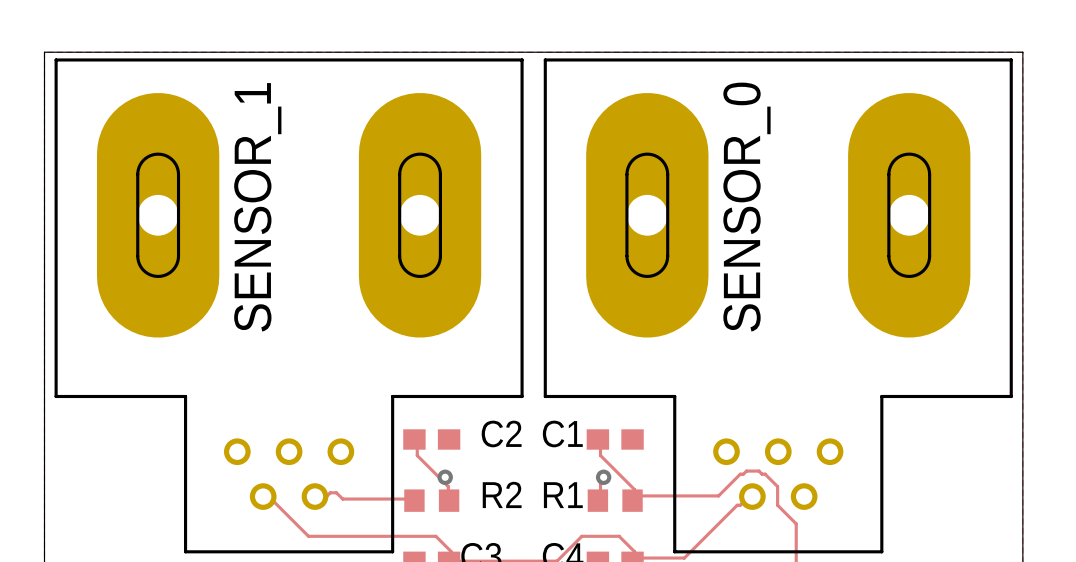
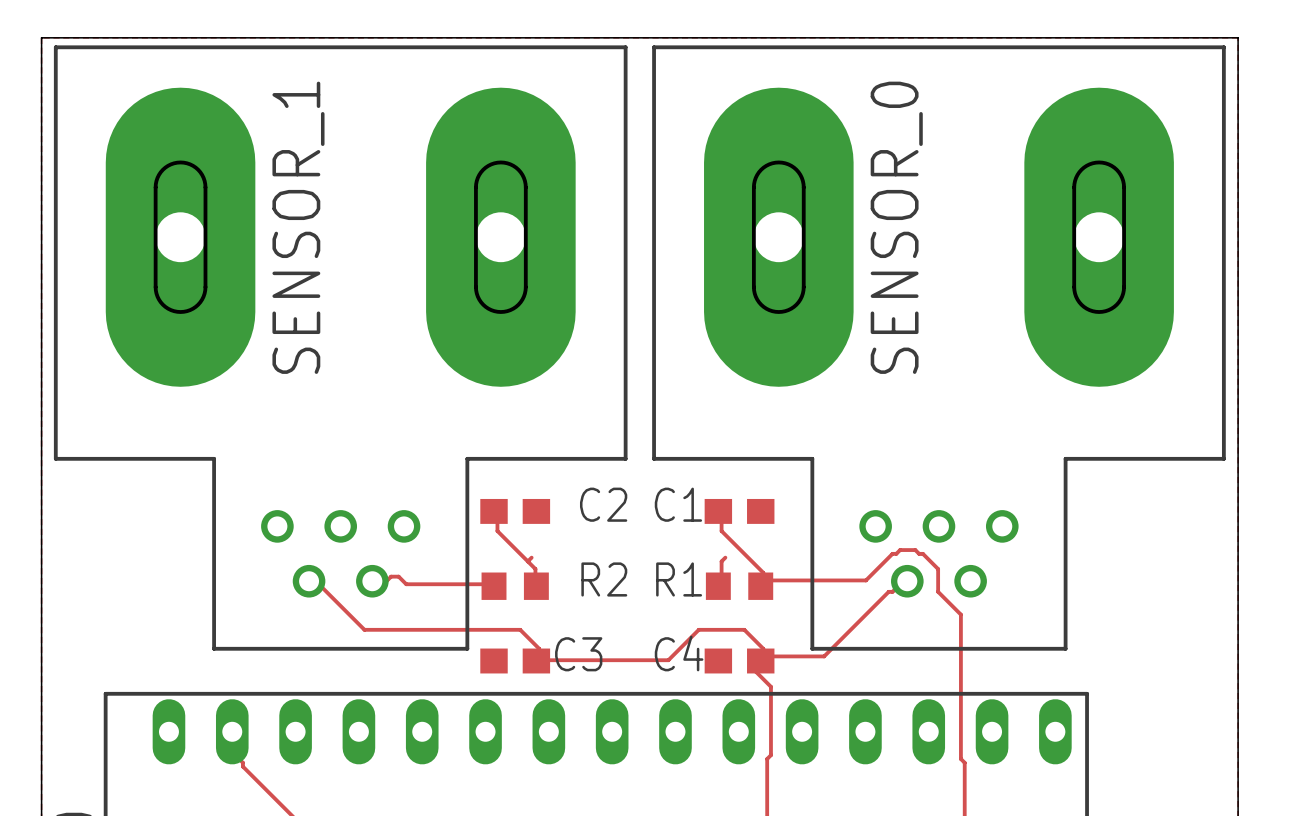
via: (445, 477) -> none
via: (603, 477) -> none

